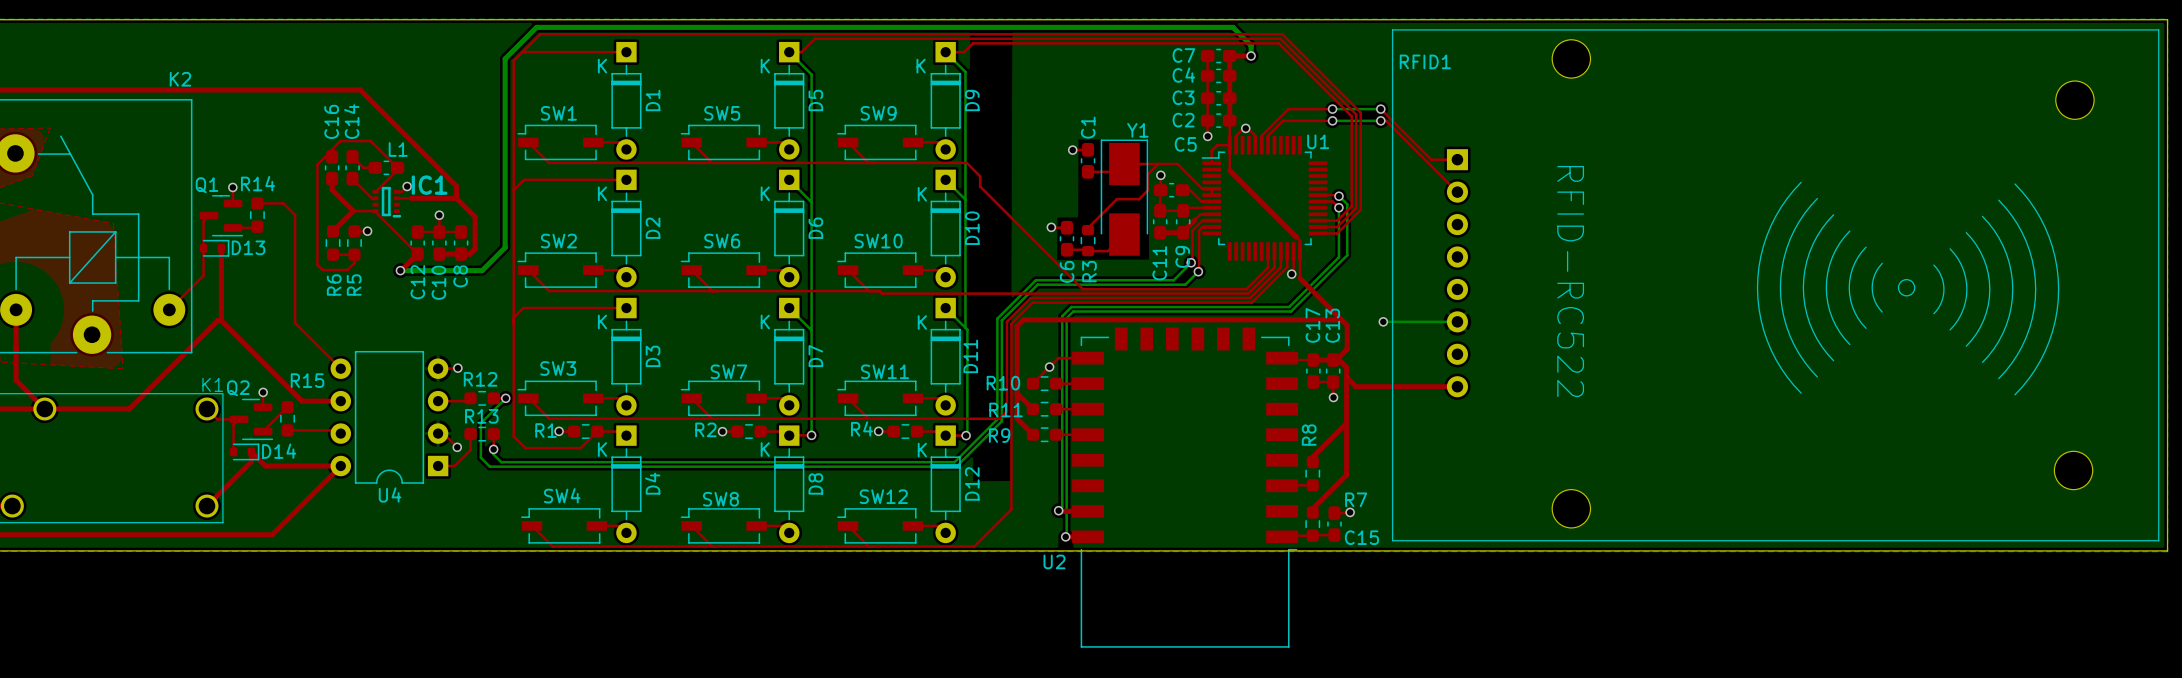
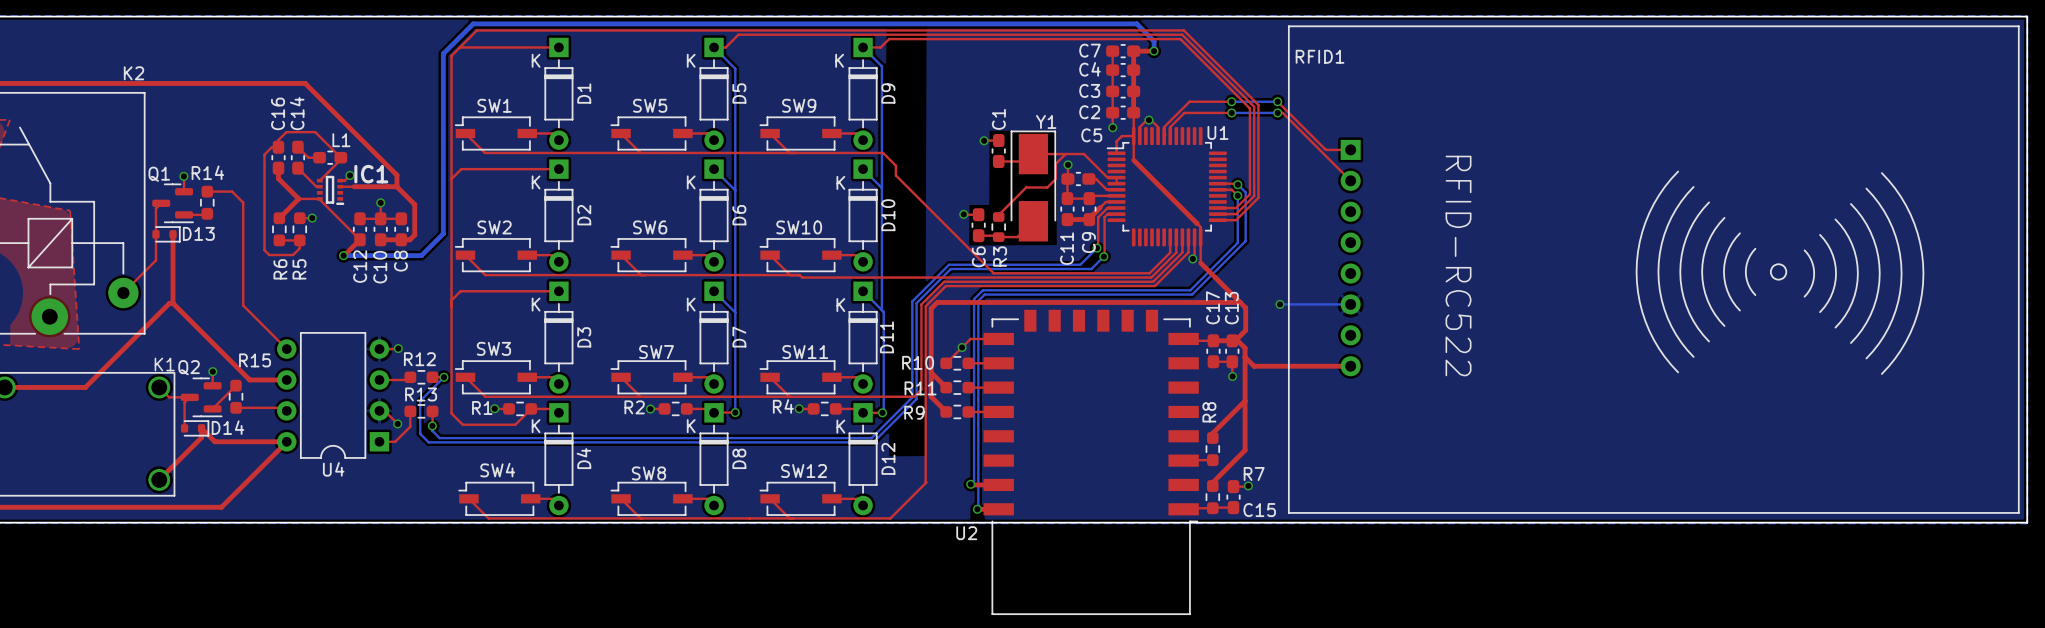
RFID1 footprint: [1391, 29, 2160, 542] -> [1288, 25, 2020, 514]

